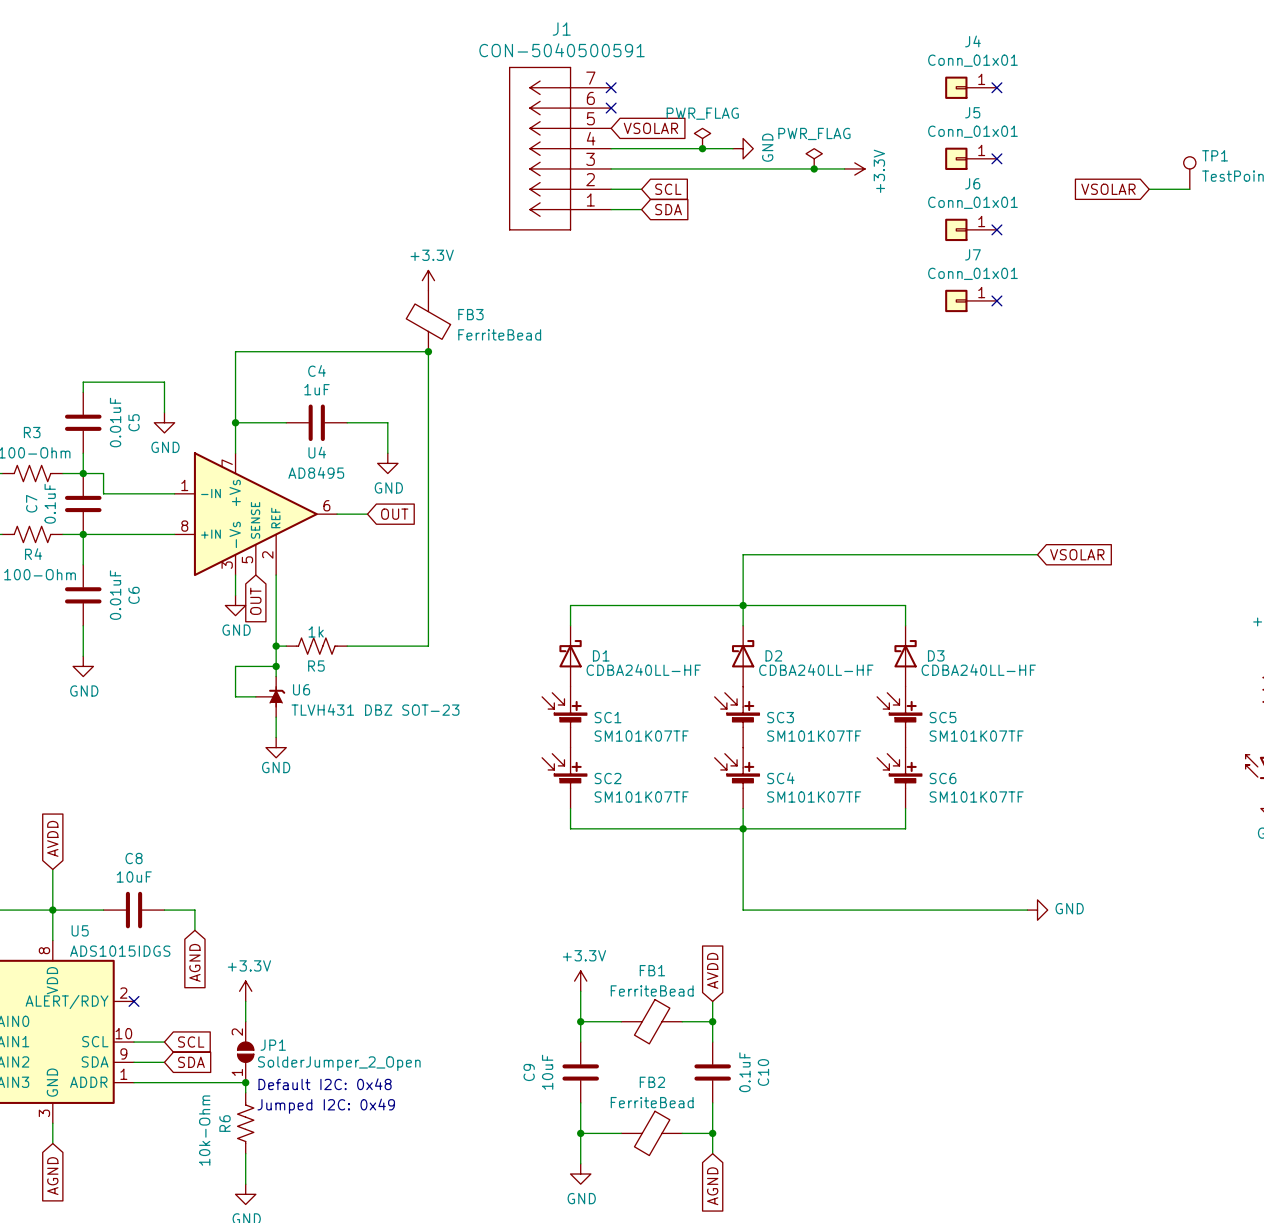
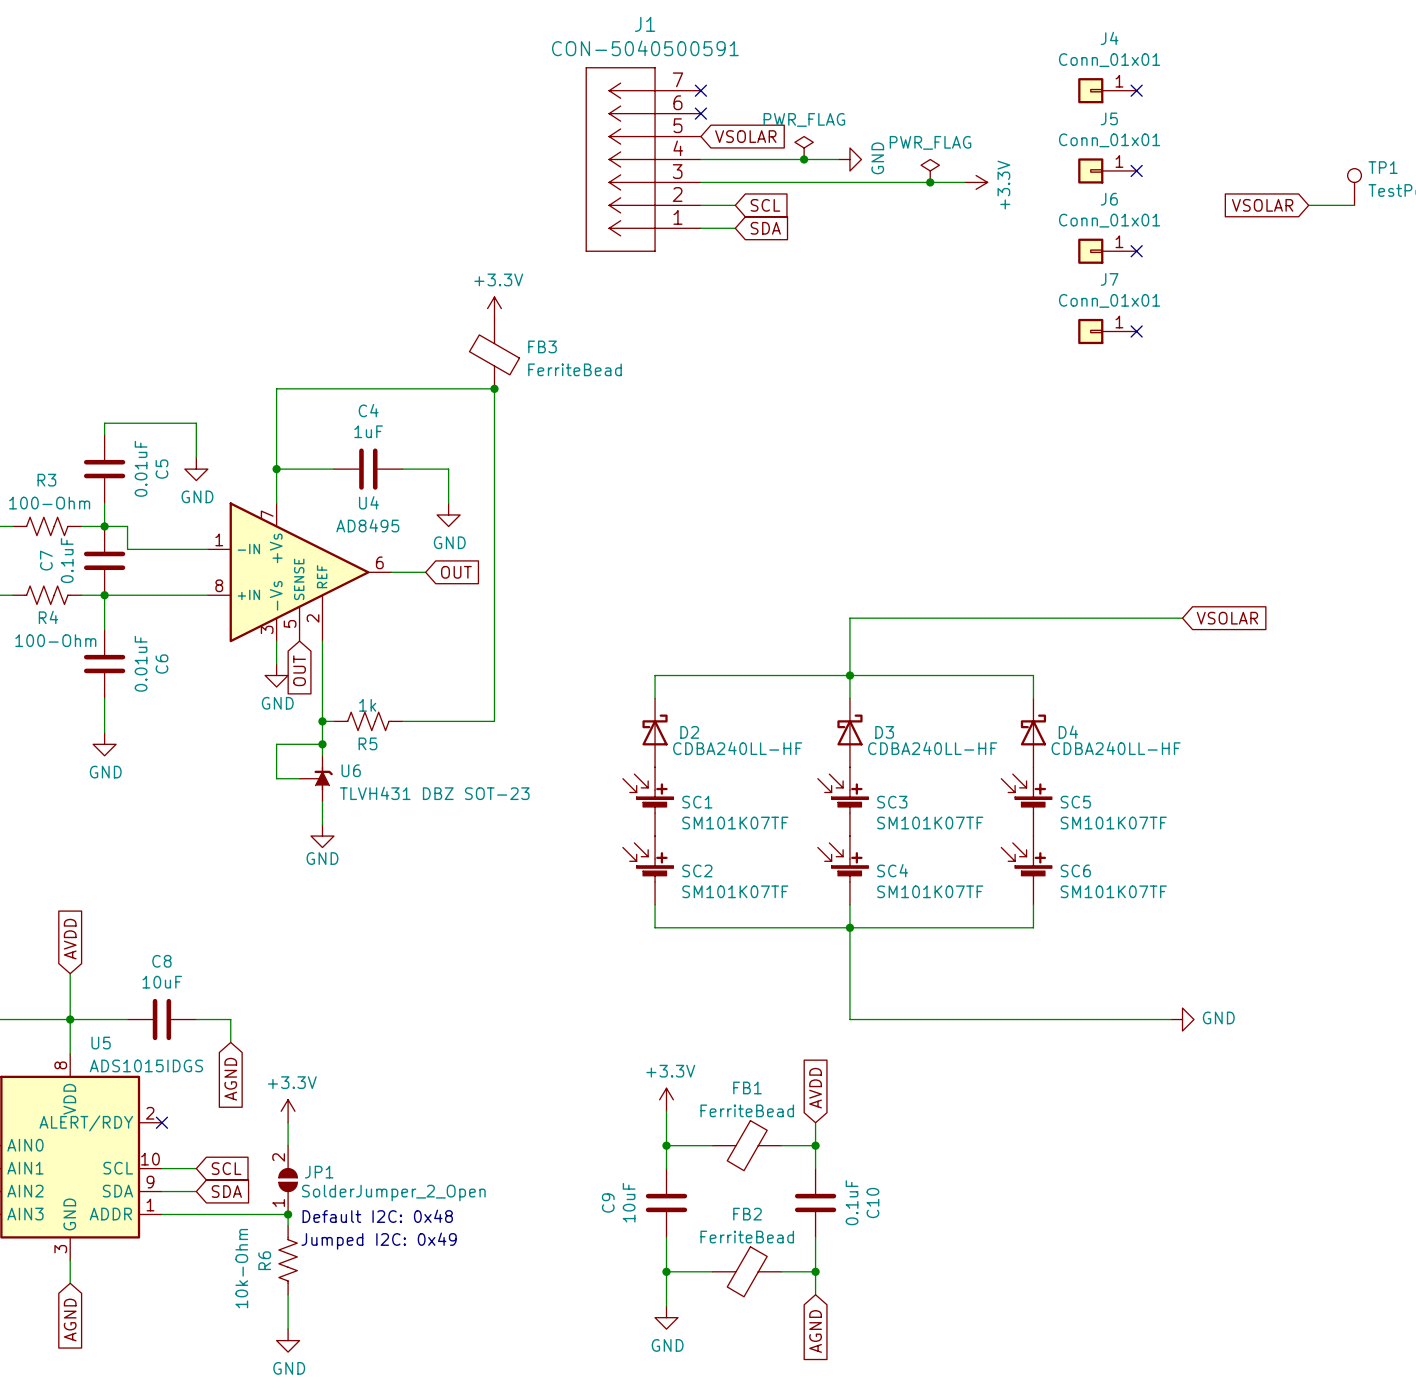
D1 name: D1 (601, 655) -> D2 (689, 732)
D2 name: D2 (773, 655) -> D3 (884, 732)
D3 name: D3 (936, 655) -> D4 (1068, 732)

